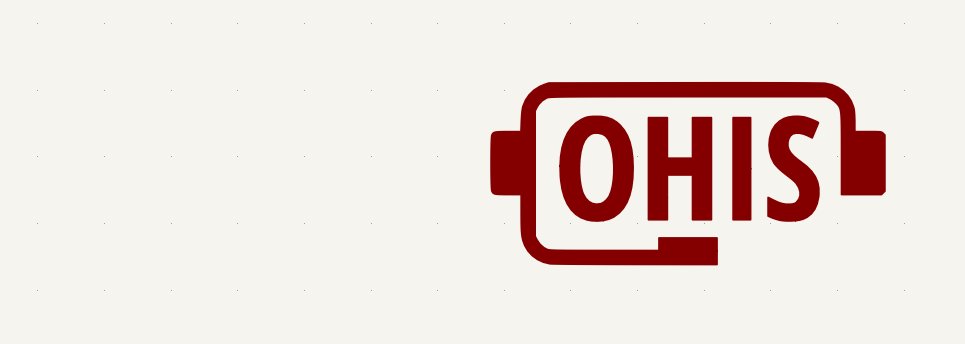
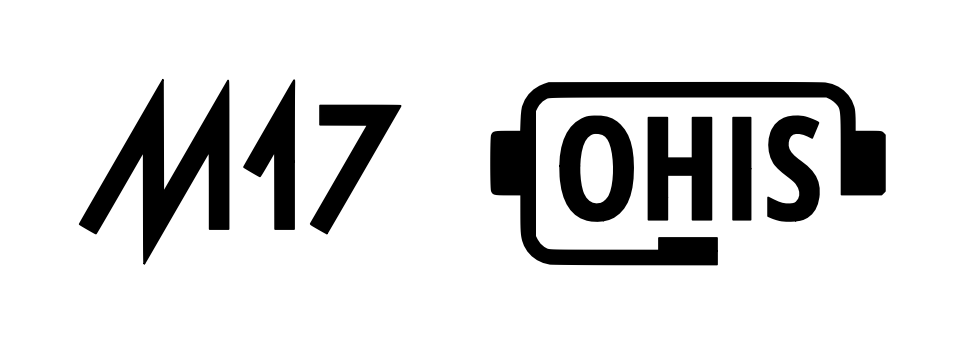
part: none -> (240, 171)

